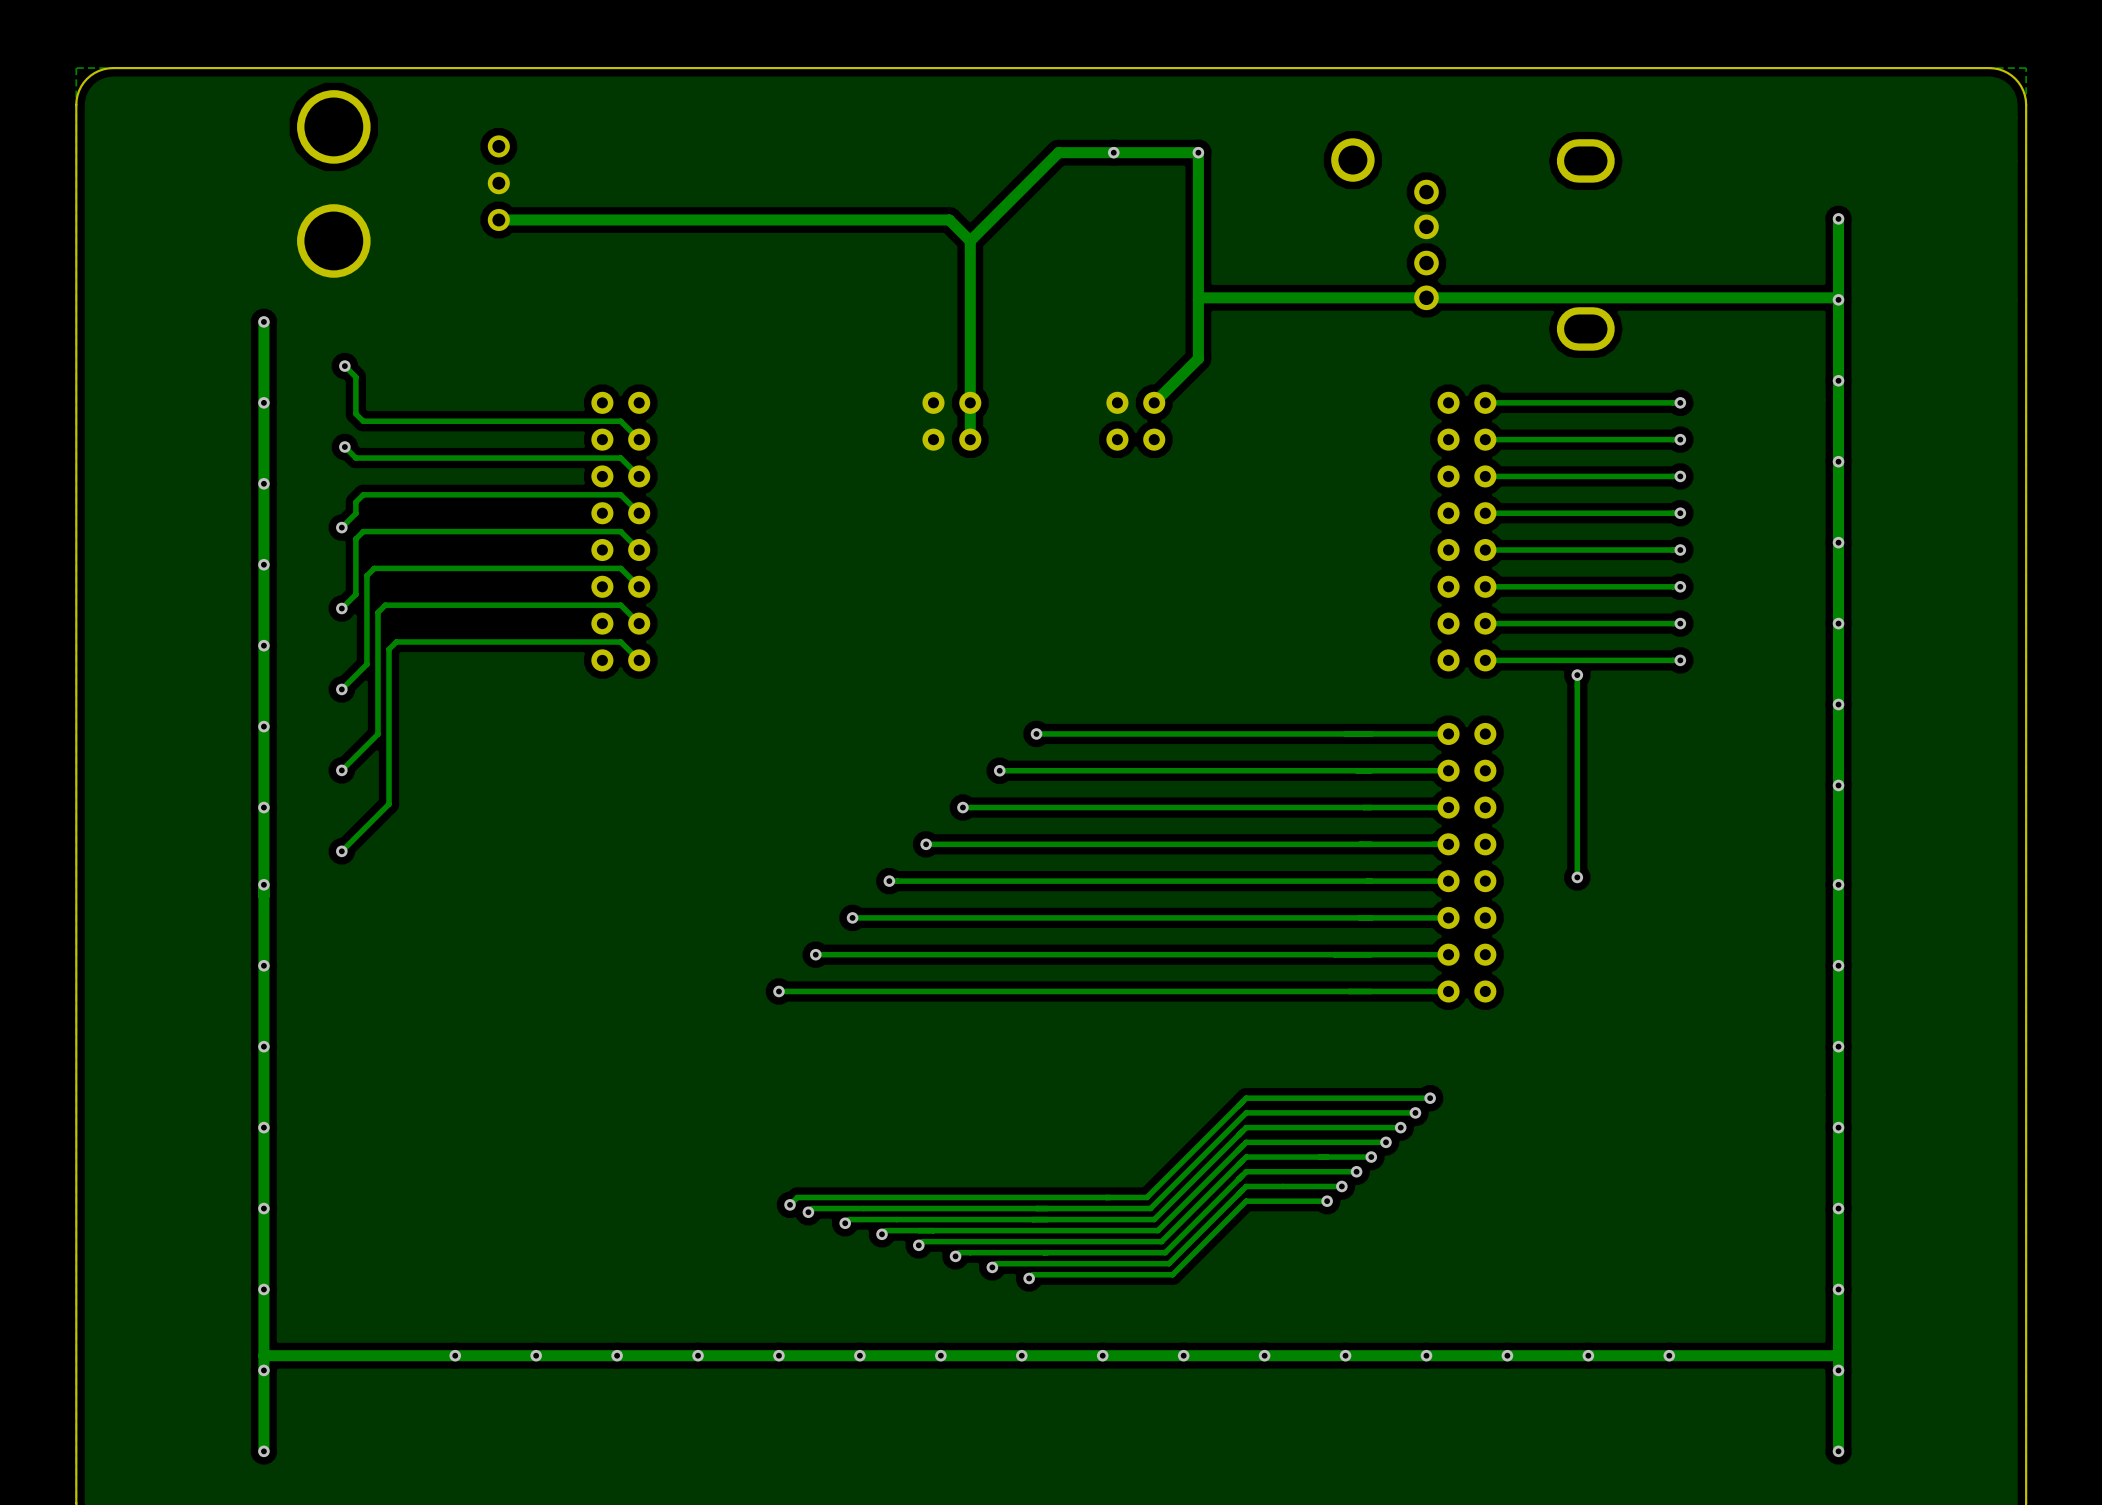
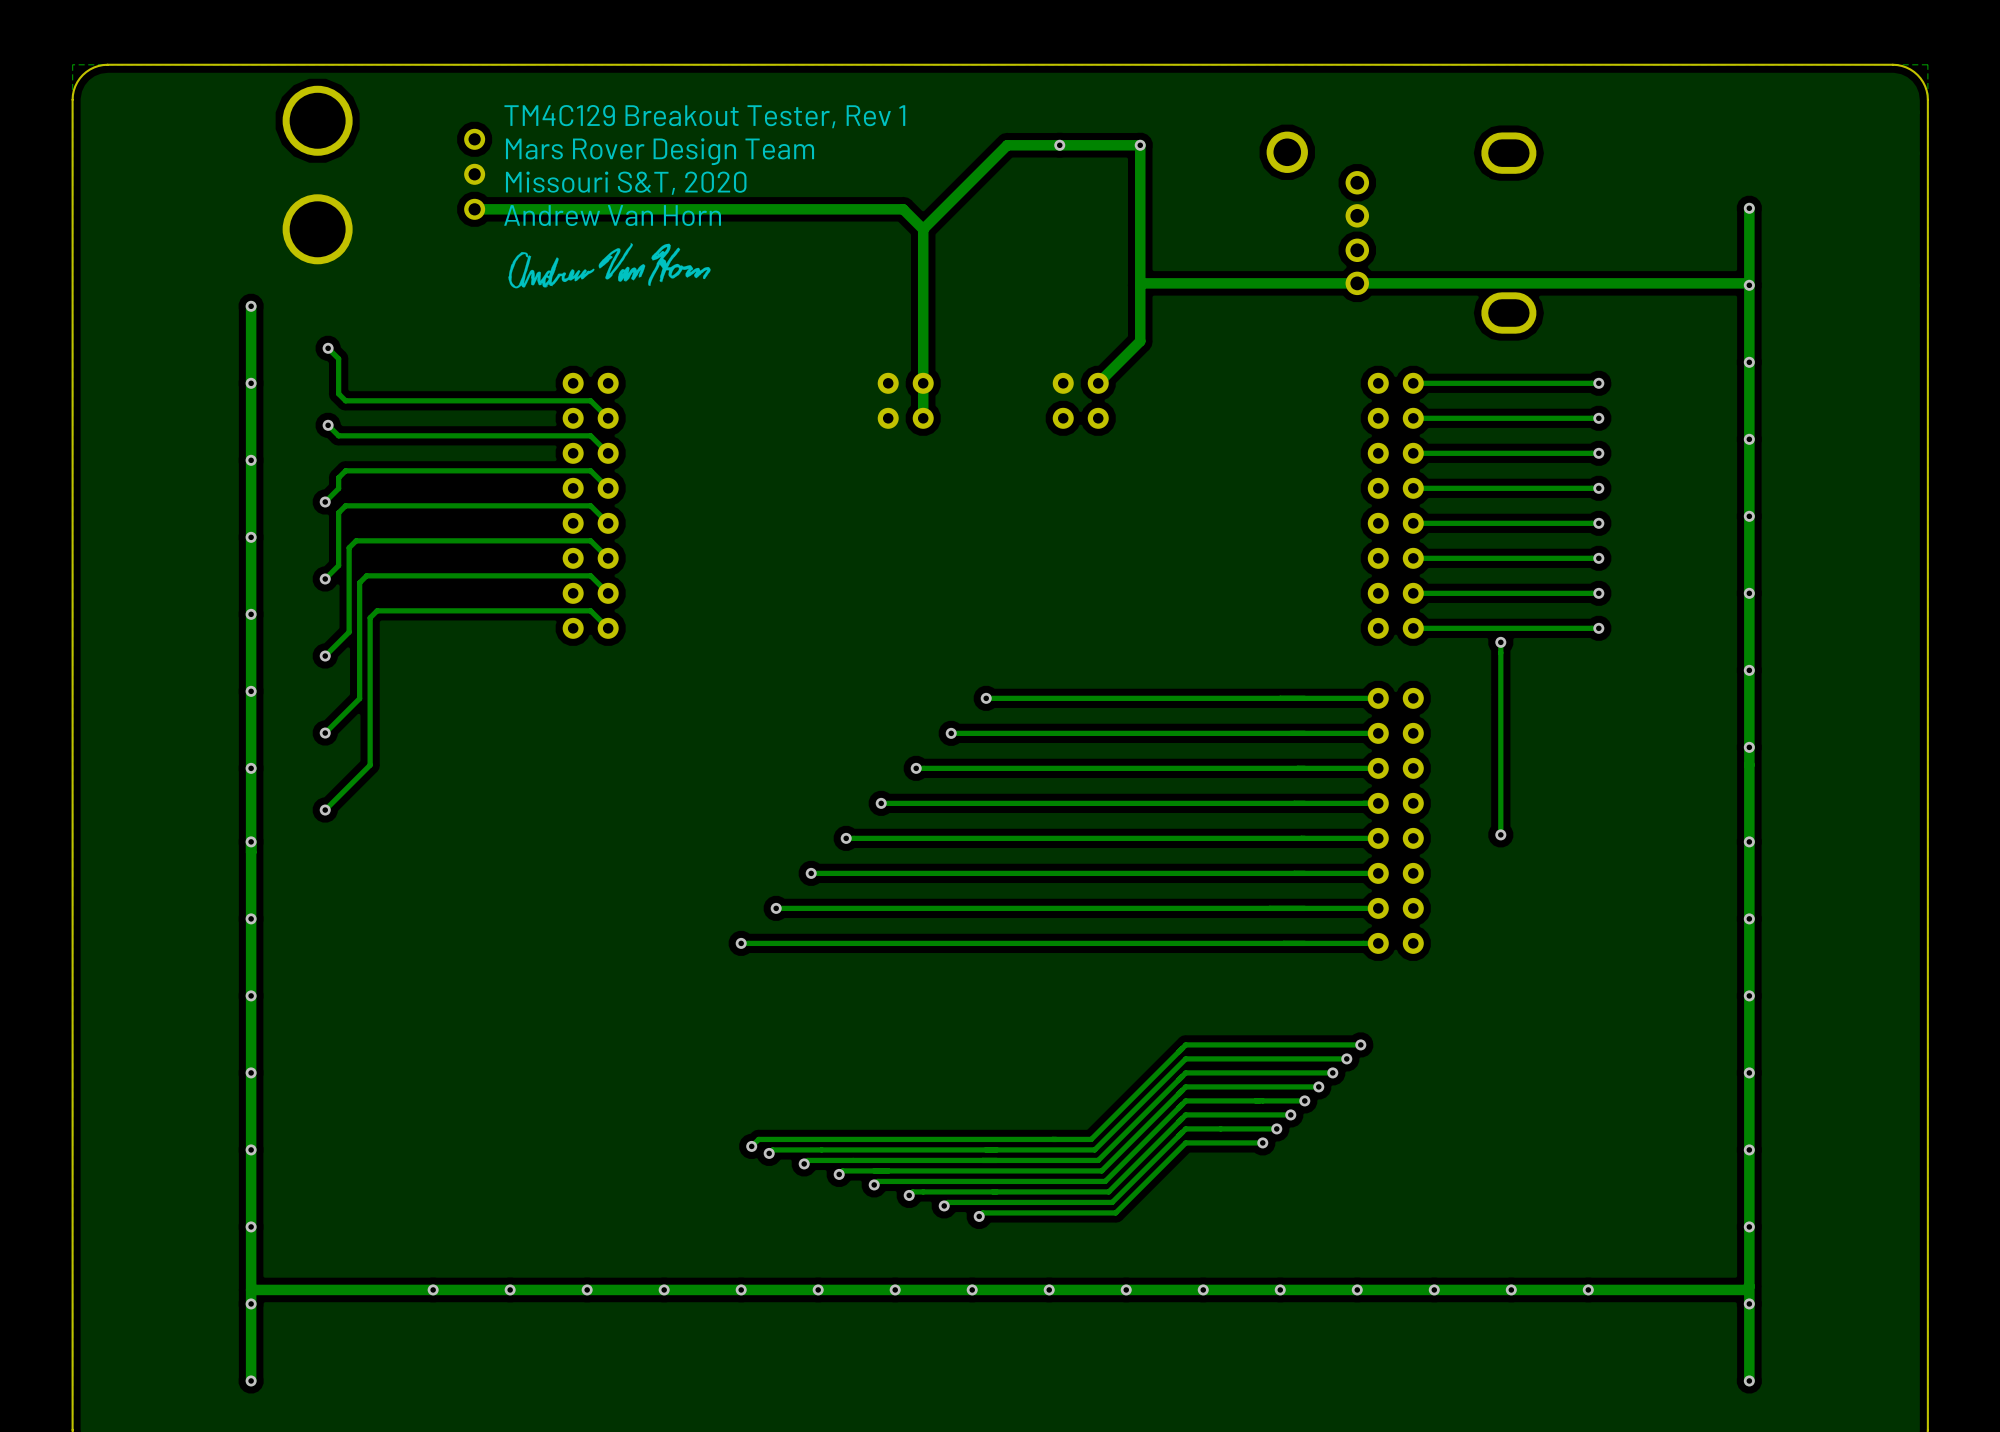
text: none -> TM4C129 Breakout Tester, Rev 1 (704, 116)
text: none -> Mars Rover Design Team (660, 151)
text: none -> Missouri S&T, 2020 (626, 183)
text: none -> Andrew Van Horn (612, 215)
drawing: none -> [508, 242, 711, 289]

